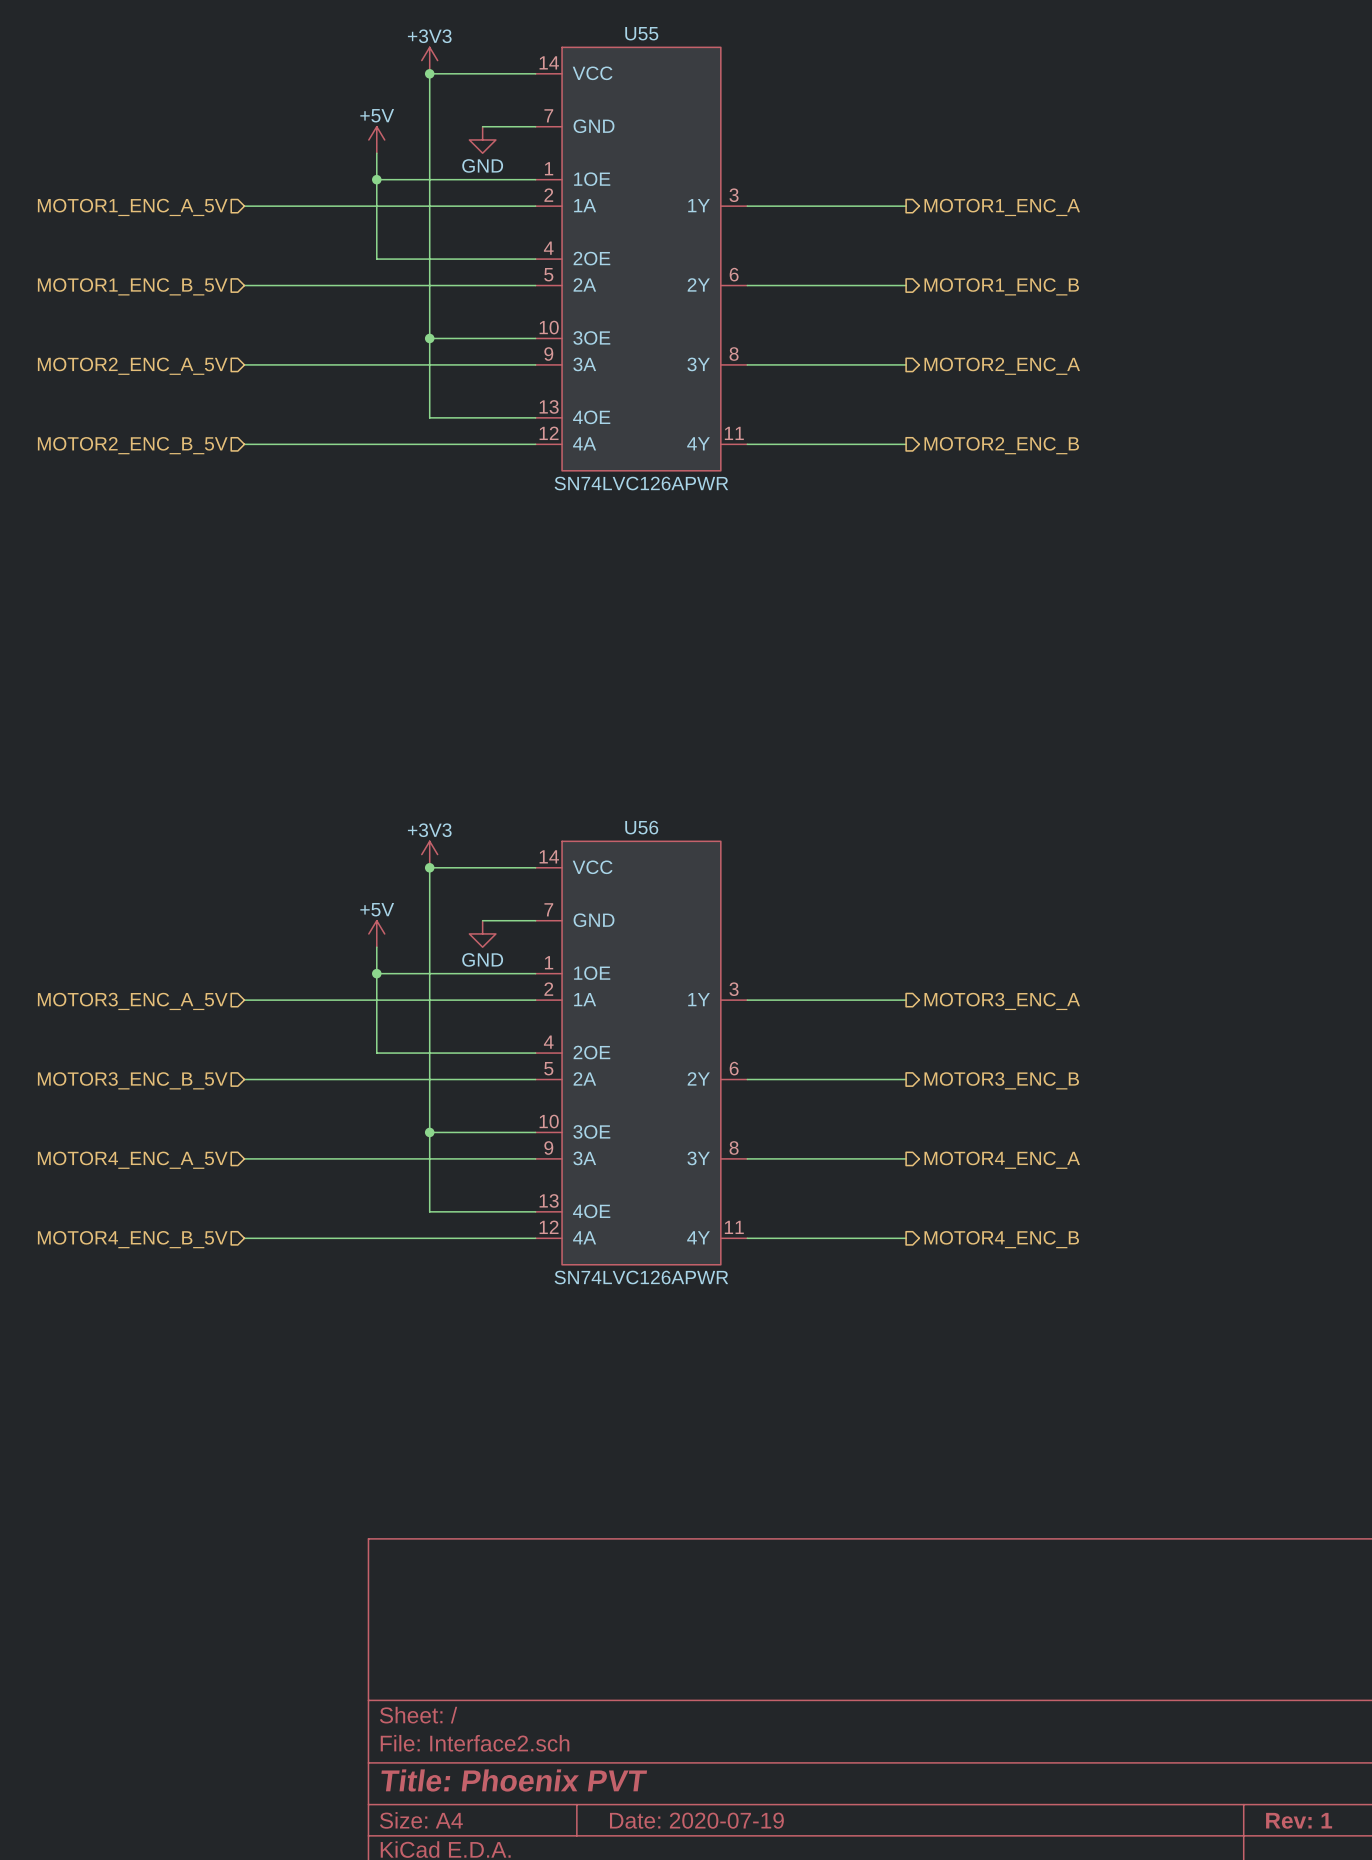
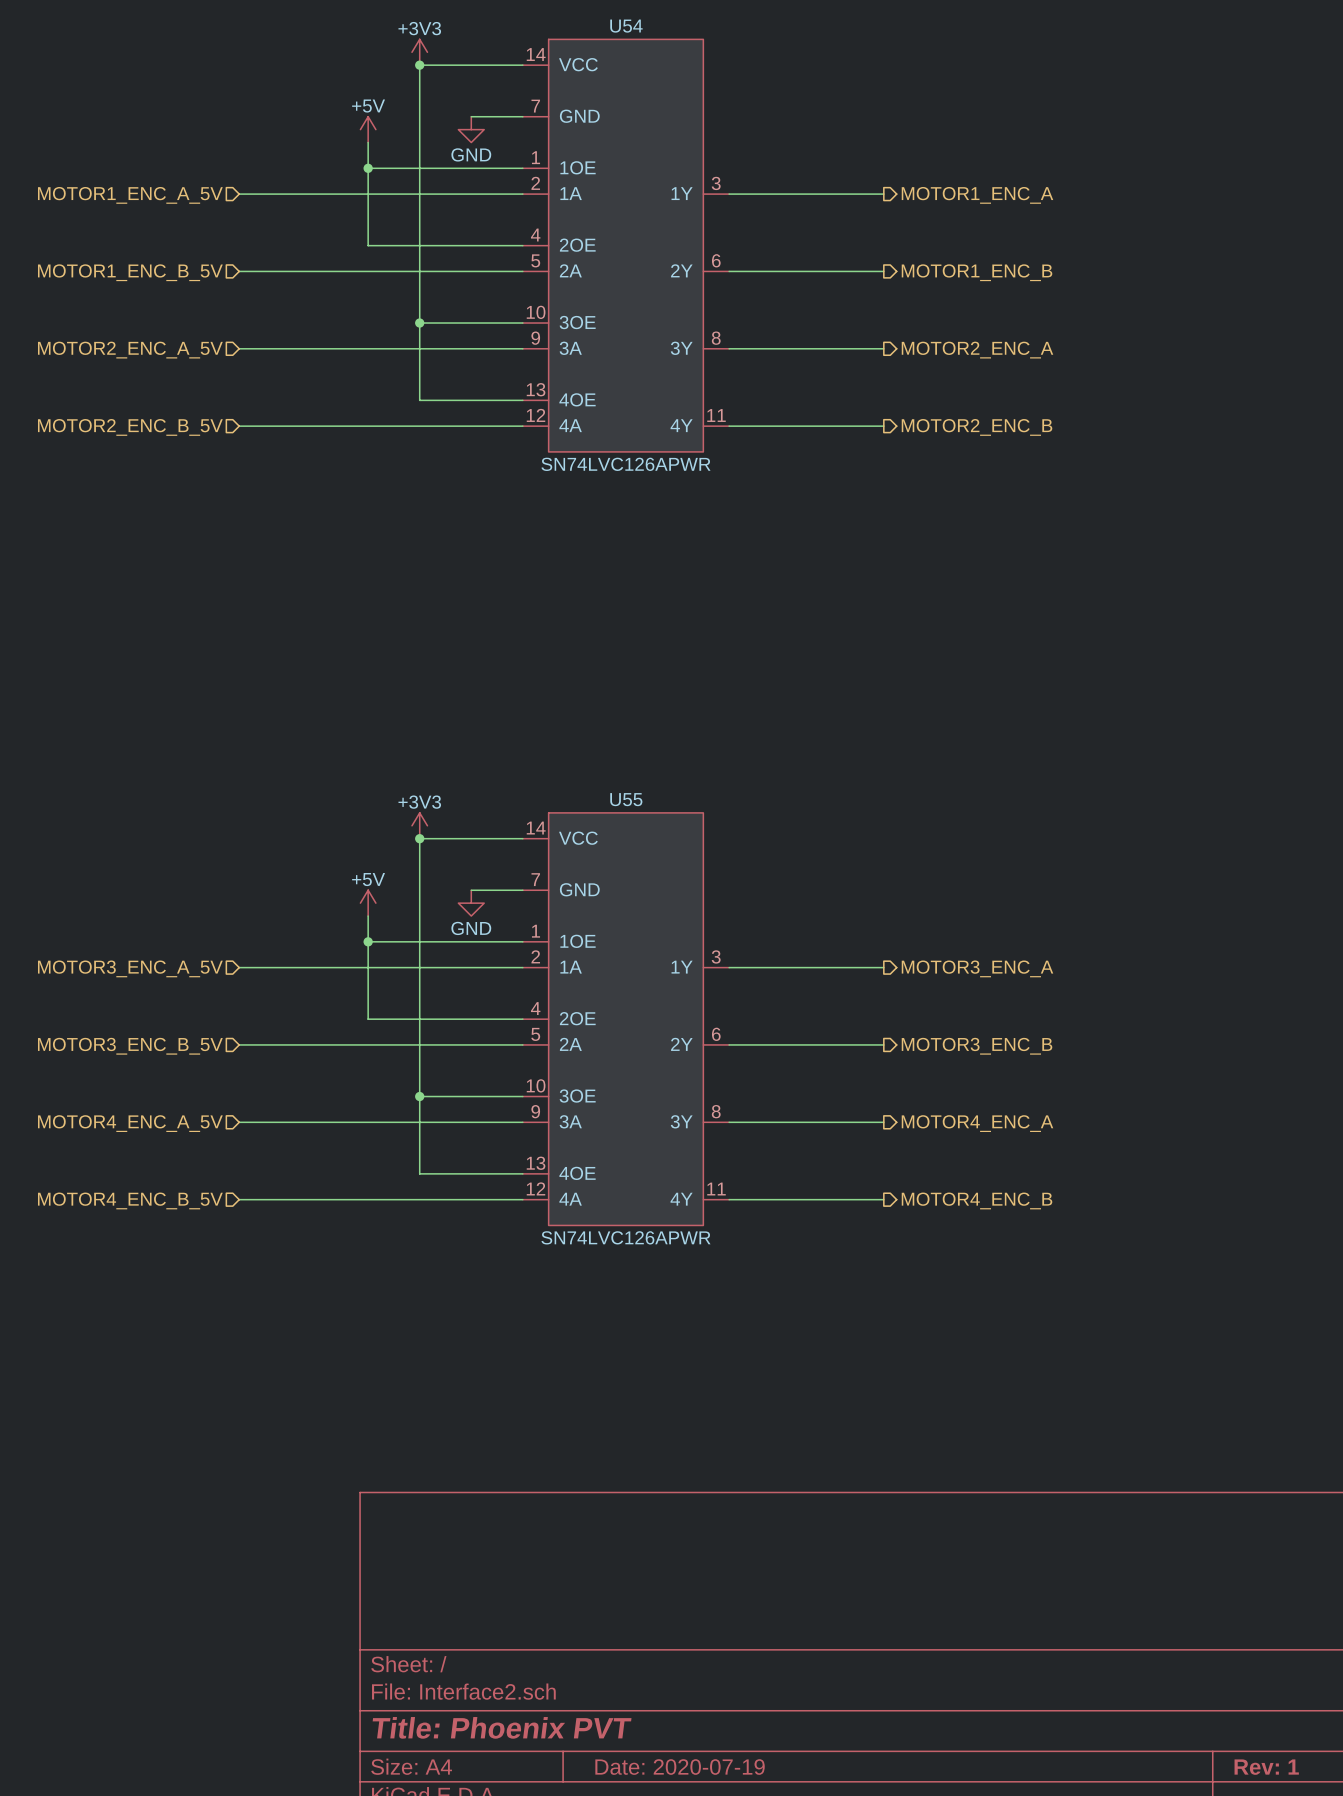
U55 name: U55 (641, 33) -> U54 (626, 26)
U56 name: U56 (641, 827) -> U55 (626, 799)

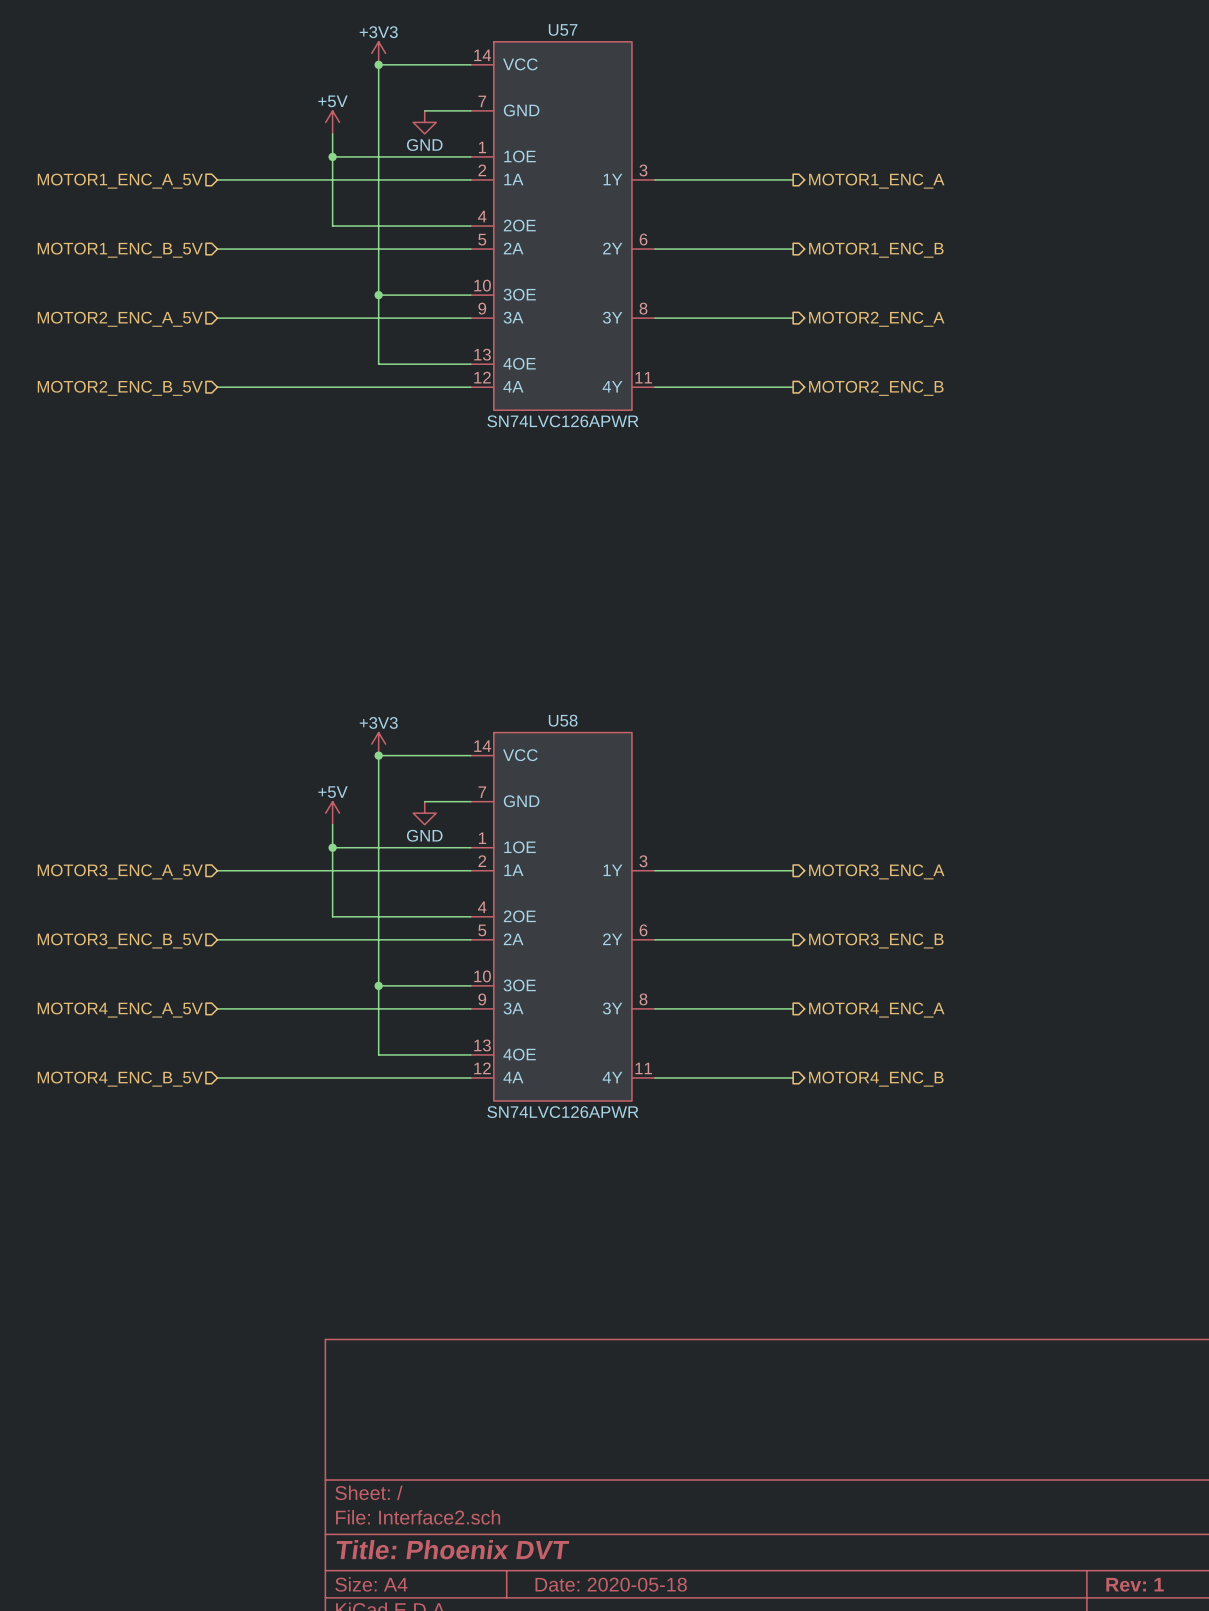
U54 name: U54 (626, 26) -> U57 (563, 29)
U55 name: U55 (626, 799) -> U58 (563, 720)
title block: Title: Phoenix PVT (502, 1727) -> Title: Phoenix DVT (452, 1549)
title block: Date: 2020-07-19 (680, 1767) -> Date: 2020-05-18 (611, 1584)

